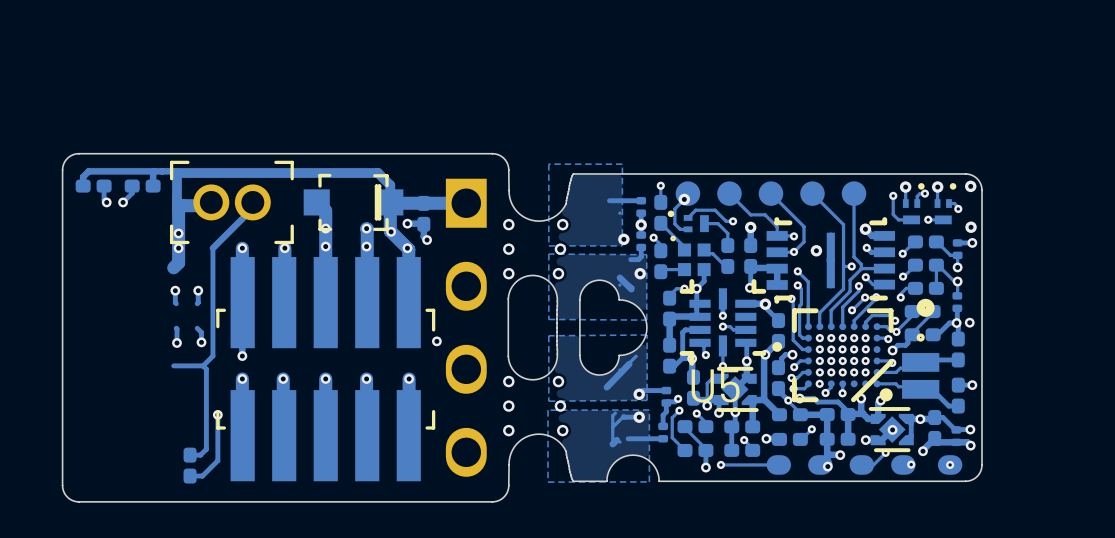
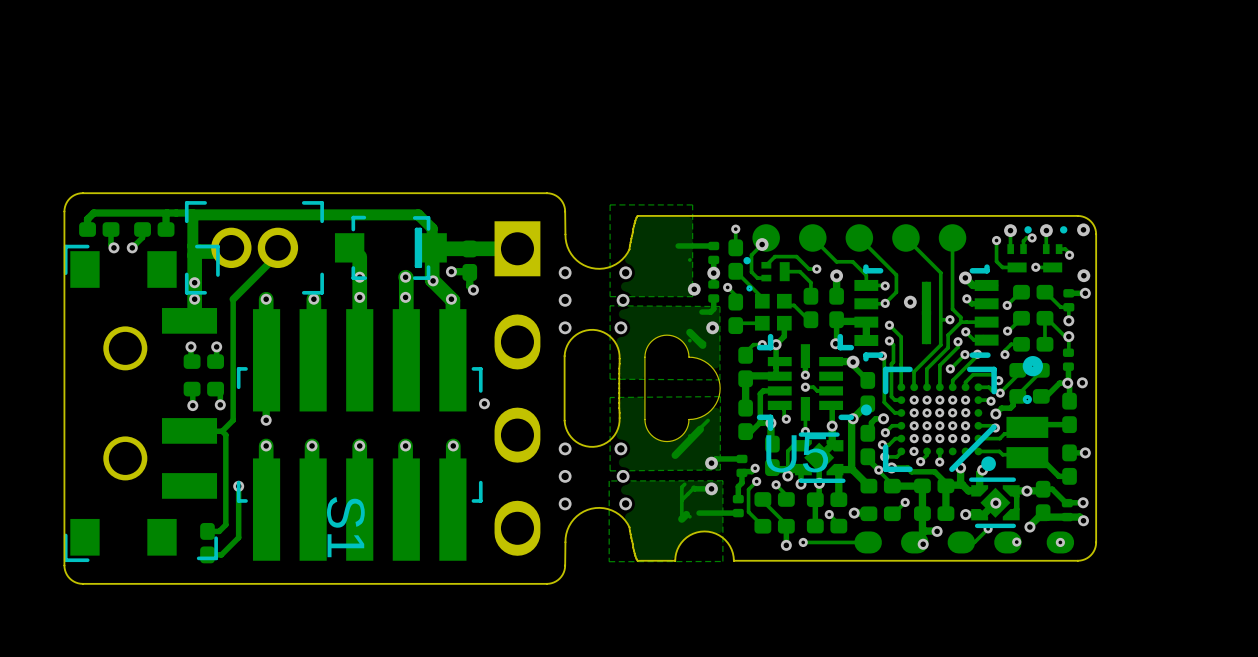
part: none -> (203, 361)
part: none -> (203, 389)
S1: none -> (141, 403)

